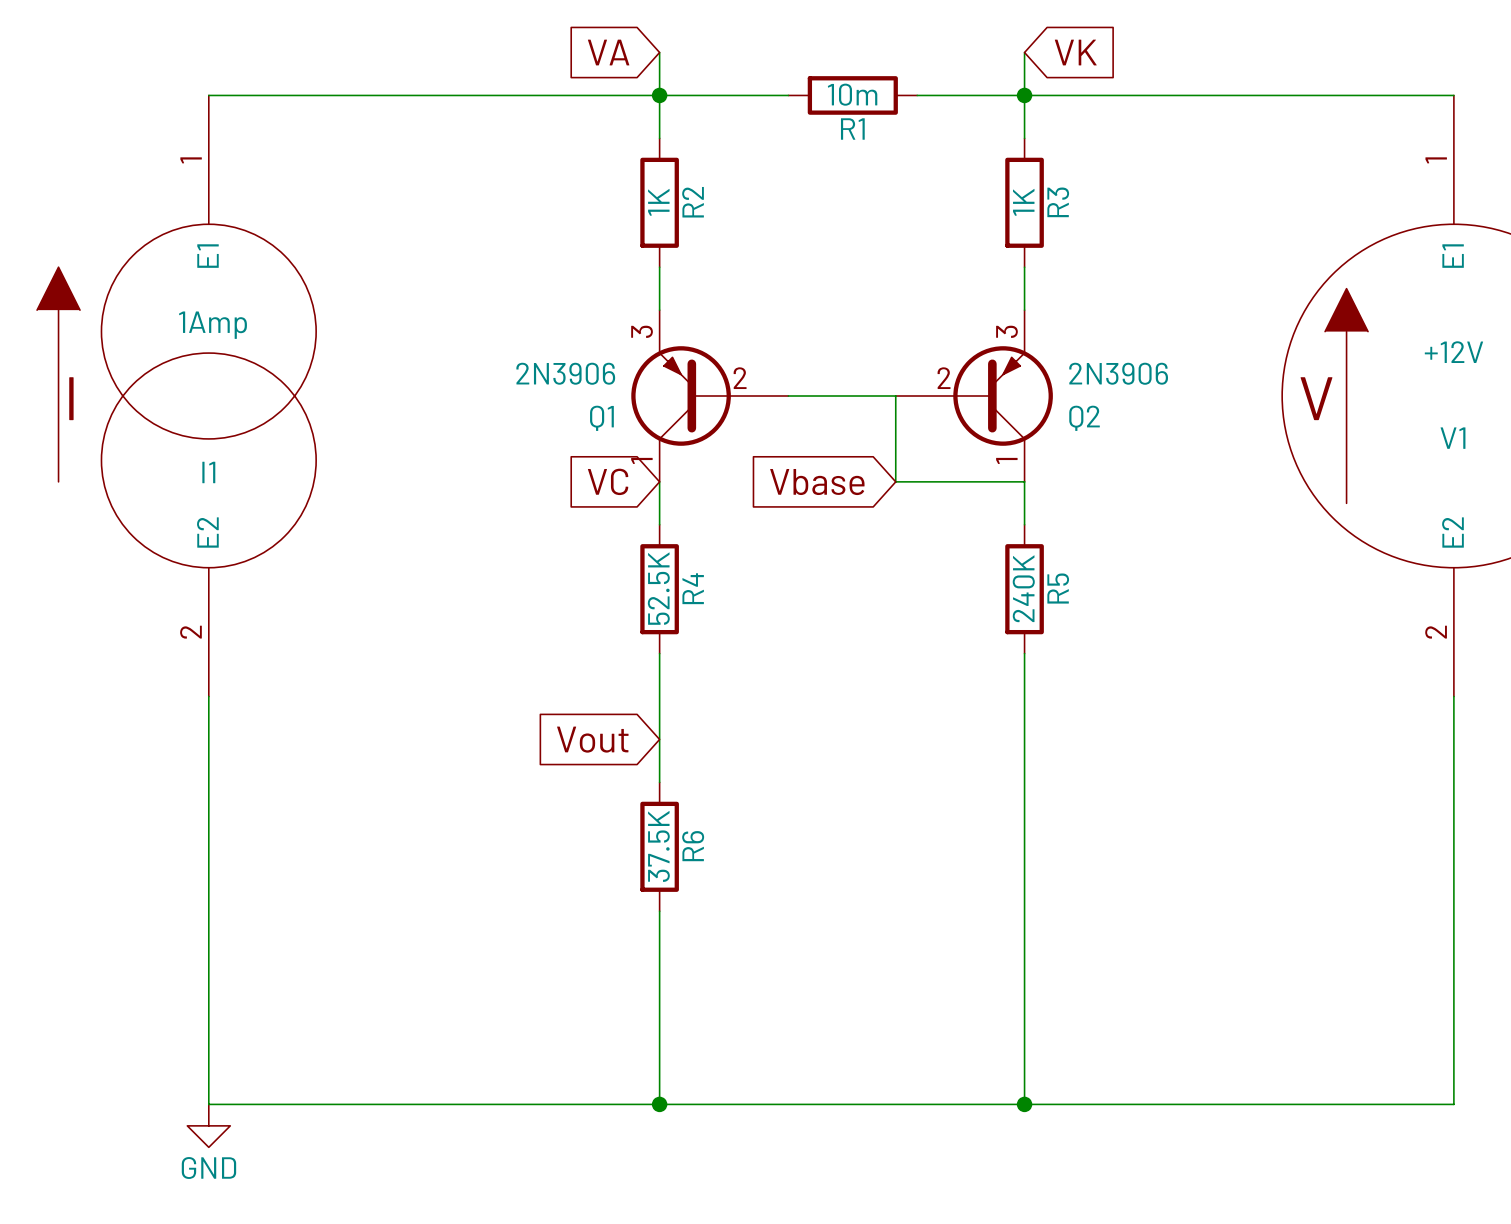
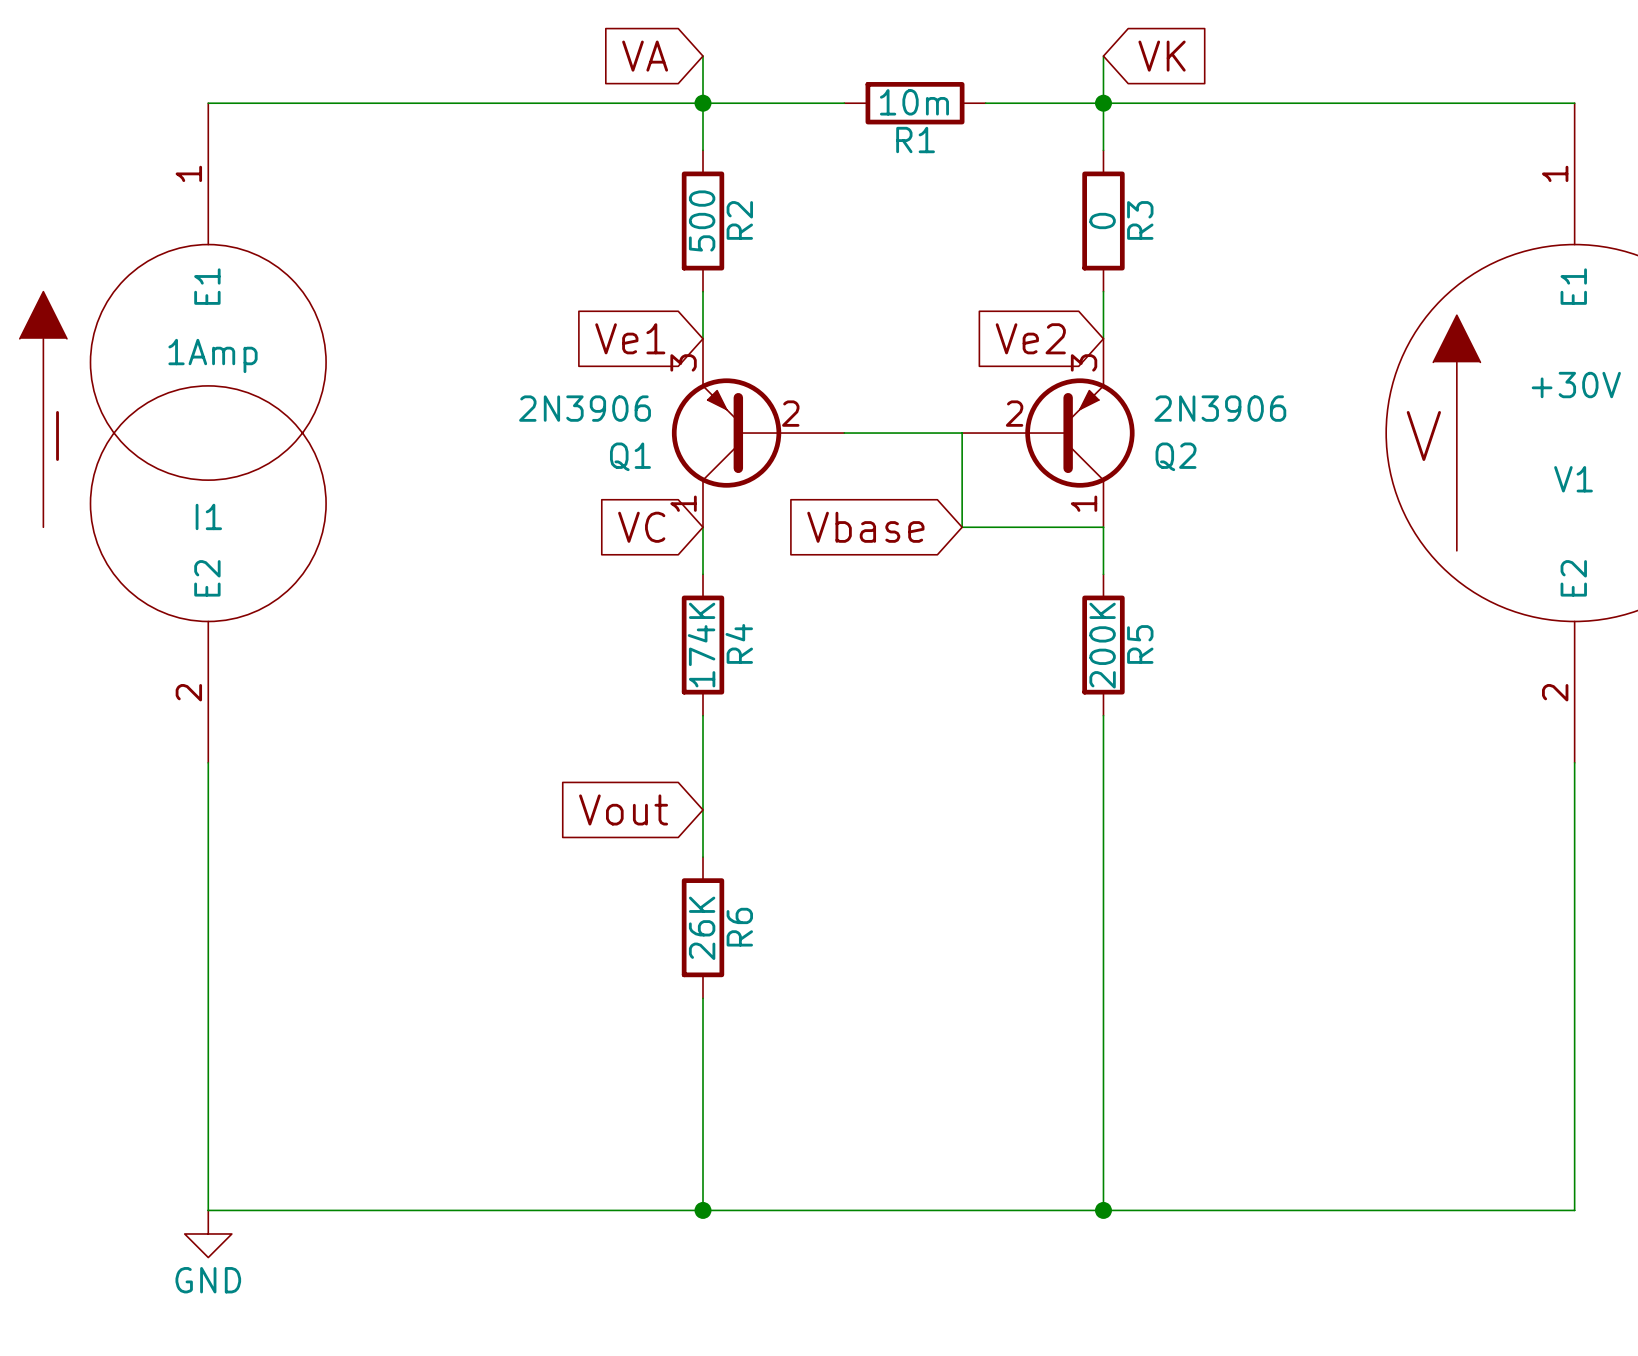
R2 value: 1K (658, 202) -> 500 (702, 221)
R3 value: 1K (1023, 202) -> 0 (1102, 221)
global label: none -> Ve1 (630, 338)
global label: none -> Ve2 (1030, 338)
V1 value: +12V (1453, 352) -> +30V (1576, 385)
R4 value: 52.5K (658, 588) -> 174K (701, 645)
R5 value: 240K (1023, 588) -> 200K (1102, 645)
R6 value: 37.5K (658, 846) -> 26K (702, 928)

